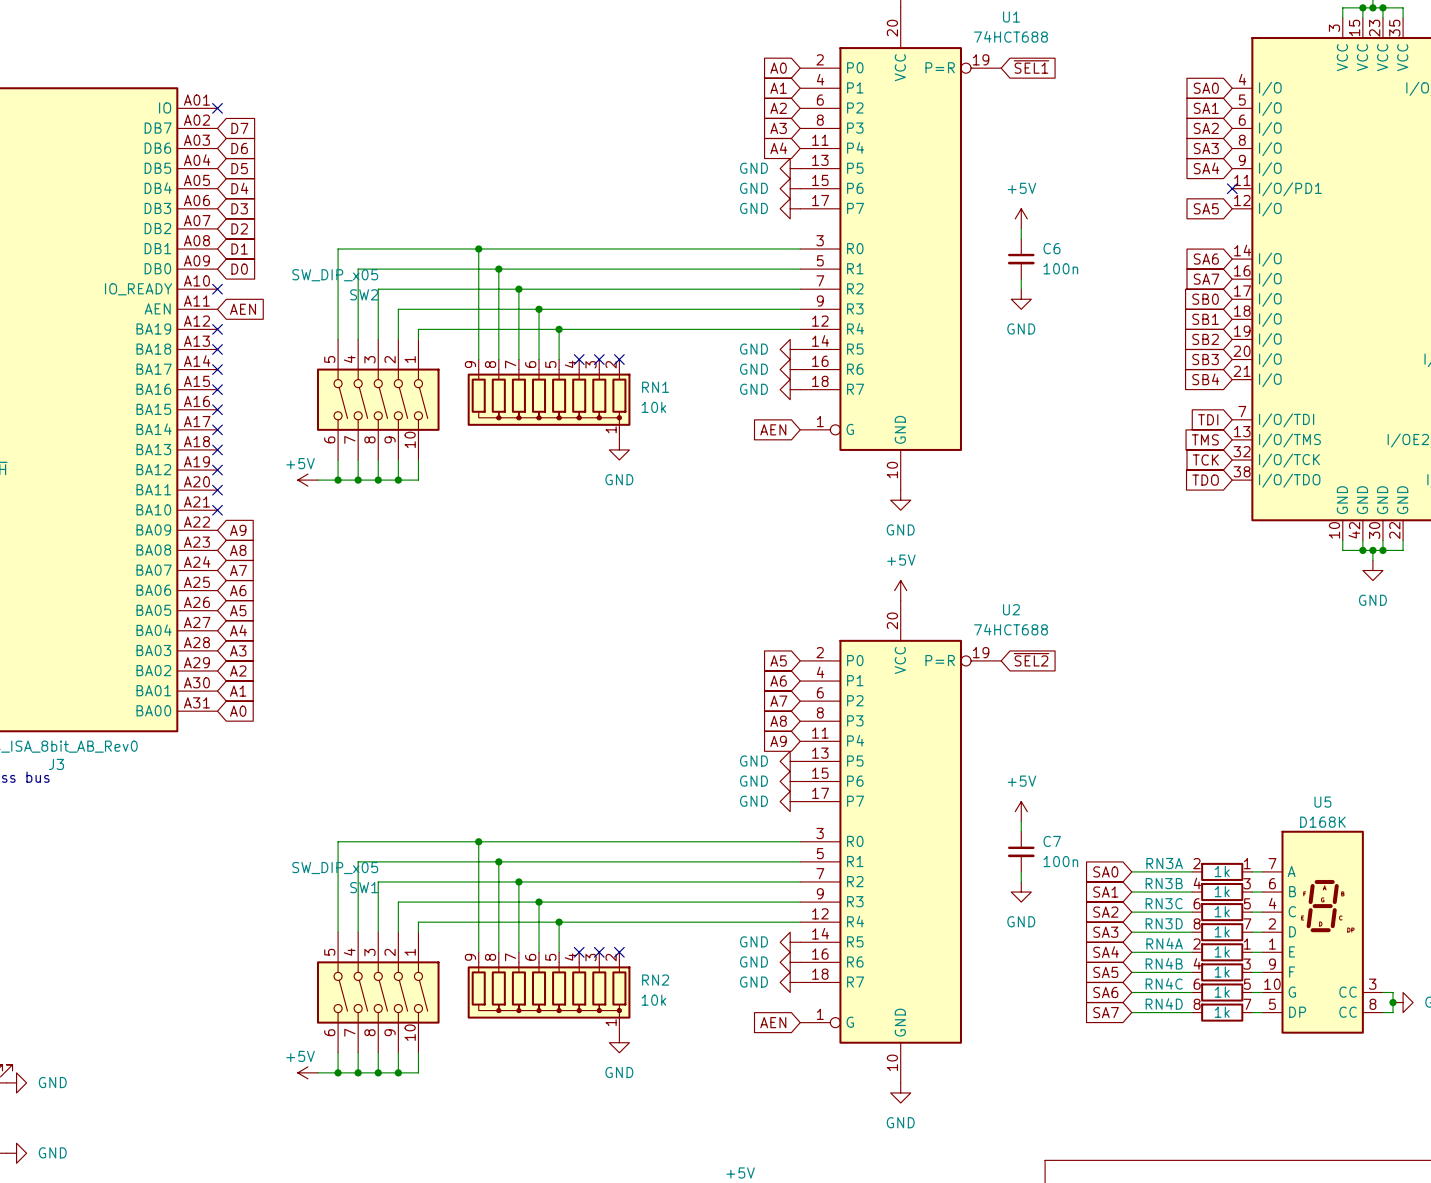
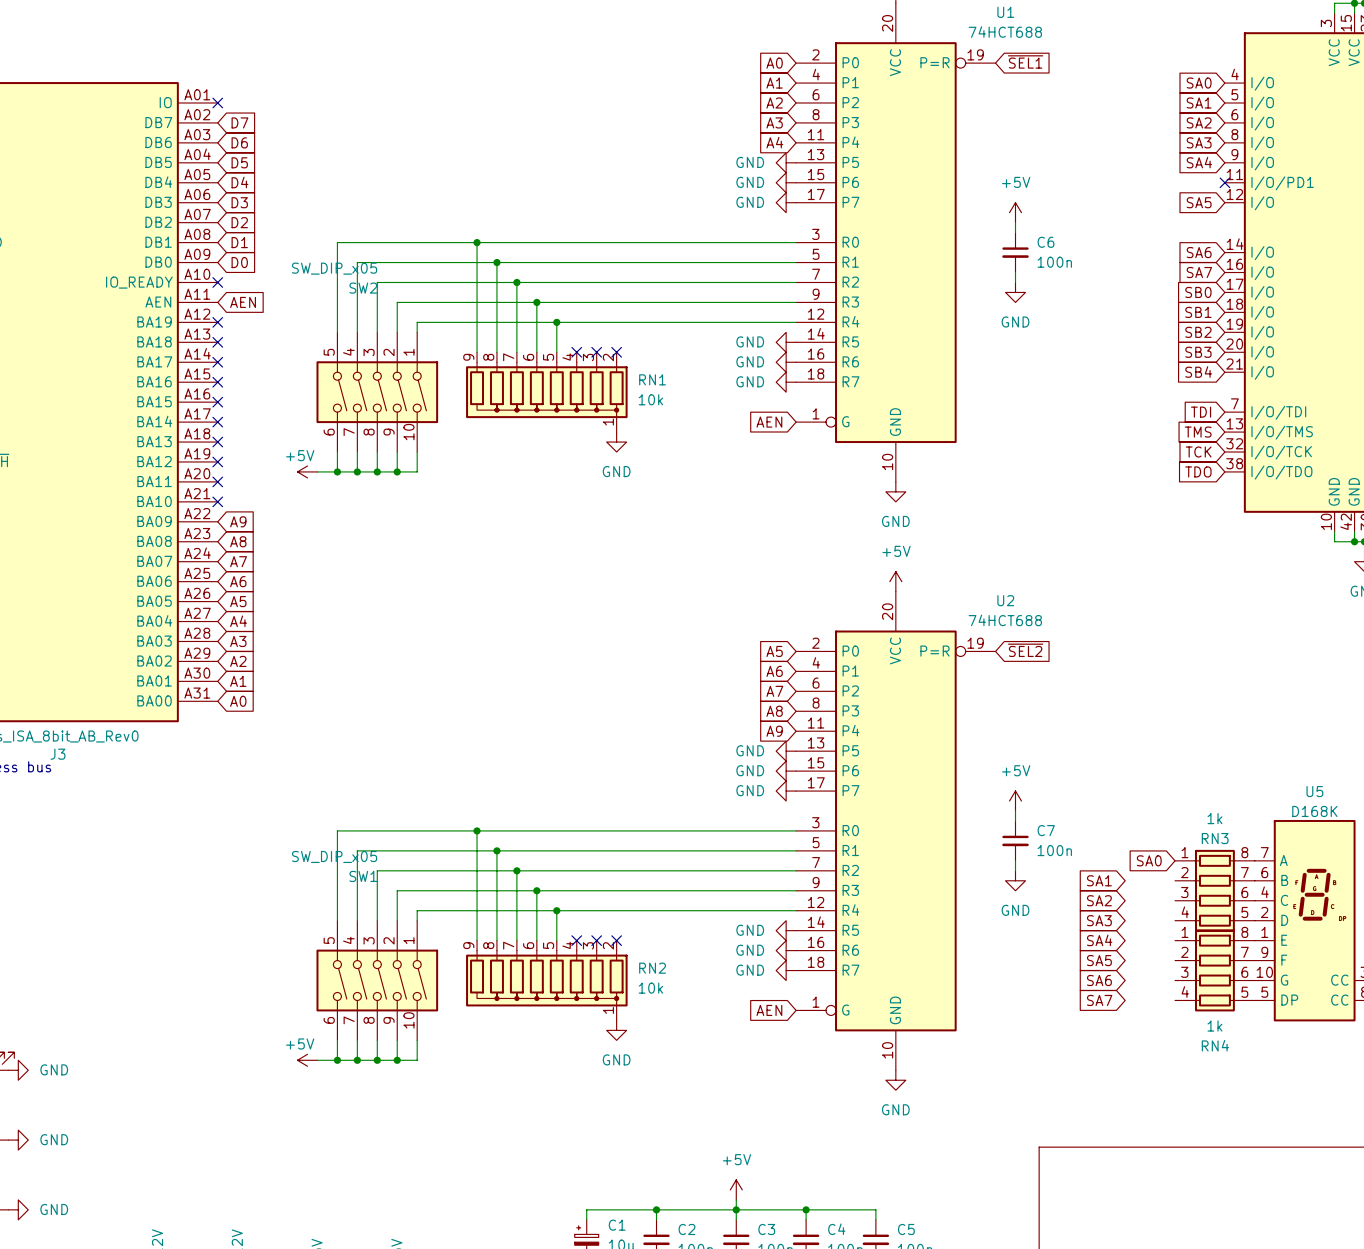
global label position: SA0 (1105, 871) -> SA0 (1149, 860)
wire: (1131, 871) (1192, 871) -> none
RN3A: 1k (1222, 871) -> none
wire: (1131, 892) (1192, 892) -> none
RN3B: 1k (1222, 892) -> none
RN3: none -> 1k (1214, 890)
wire: (1131, 912) (1192, 912) -> none
RN3C: 1k (1222, 912) -> none
wire: (1131, 932) (1192, 932) -> none
RN3D: 1k (1222, 932) -> none
wire: (1131, 952) (1192, 952) -> none
RN4A: 1k (1222, 952) -> none
wire: (1131, 972) (1192, 972) -> none
RN4B: 1k (1222, 972) -> none
RN4: none -> 1k (1214, 970)
wire: (1131, 992) (1192, 992) -> none
RN4C: 1k (1222, 992) -> none
wire: (1131, 1012) (1192, 1012) -> none
RN4D: 1k (1222, 1012) -> none

